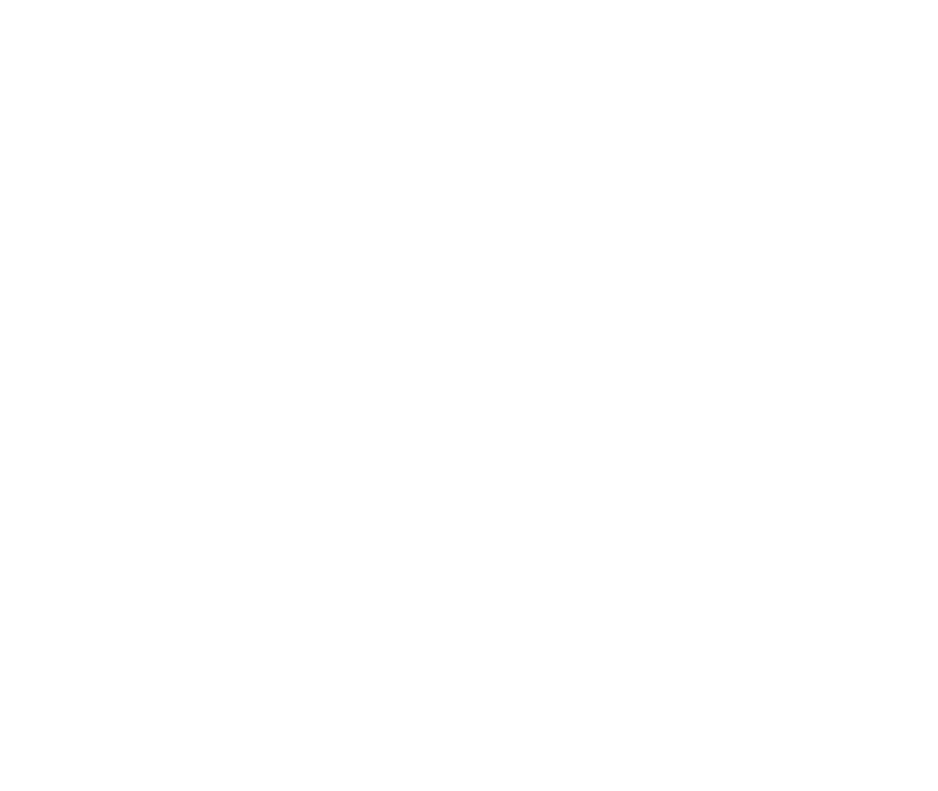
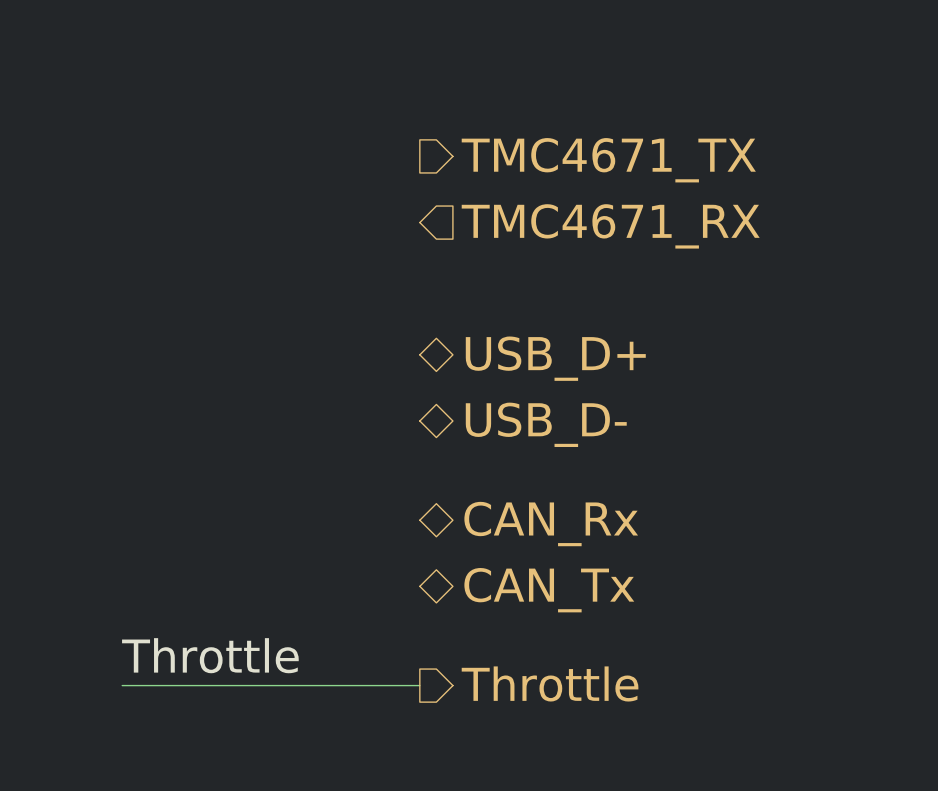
hierarchical label: none -> TMC4671_TX (608, 160)
hierarchical label: none -> TMC4671_RX (610, 226)
hierarchical label: none -> USB_D+ (555, 358)
hierarchical label: none -> USB_D- (546, 424)
hierarchical label: none -> CAN_Rx (551, 524)
hierarchical label: none -> CAN_Tx (549, 590)
label: none -> Throttle (210, 655)
hierarchical label: none -> Throttle (550, 683)
wire: none -> (122, 685) (419, 685)

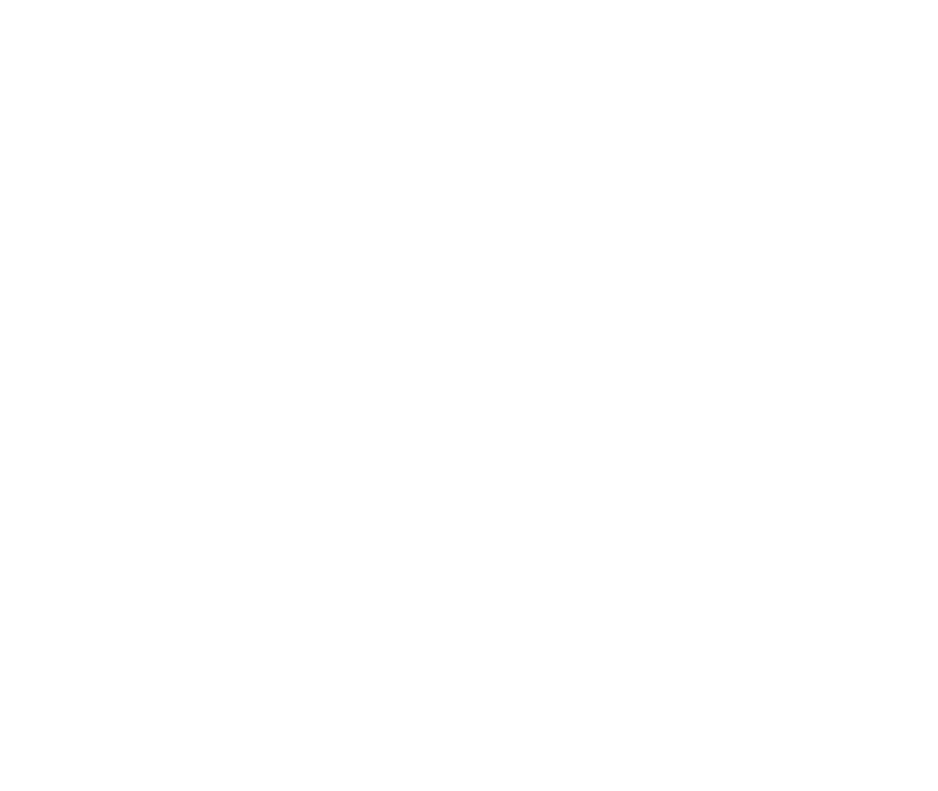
hierarchical label: TMC4671_TX (608, 160) -> none
hierarchical label: TMC4671_RX (610, 226) -> none
hierarchical label: USB_D+ (555, 358) -> none
hierarchical label: USB_D- (546, 424) -> none
hierarchical label: CAN_Rx (551, 524) -> none
hierarchical label: CAN_Tx (549, 590) -> none
label: Throttle (210, 655) -> none
hierarchical label: Throttle (550, 683) -> none
wire: (122, 685) (419, 685) -> none

